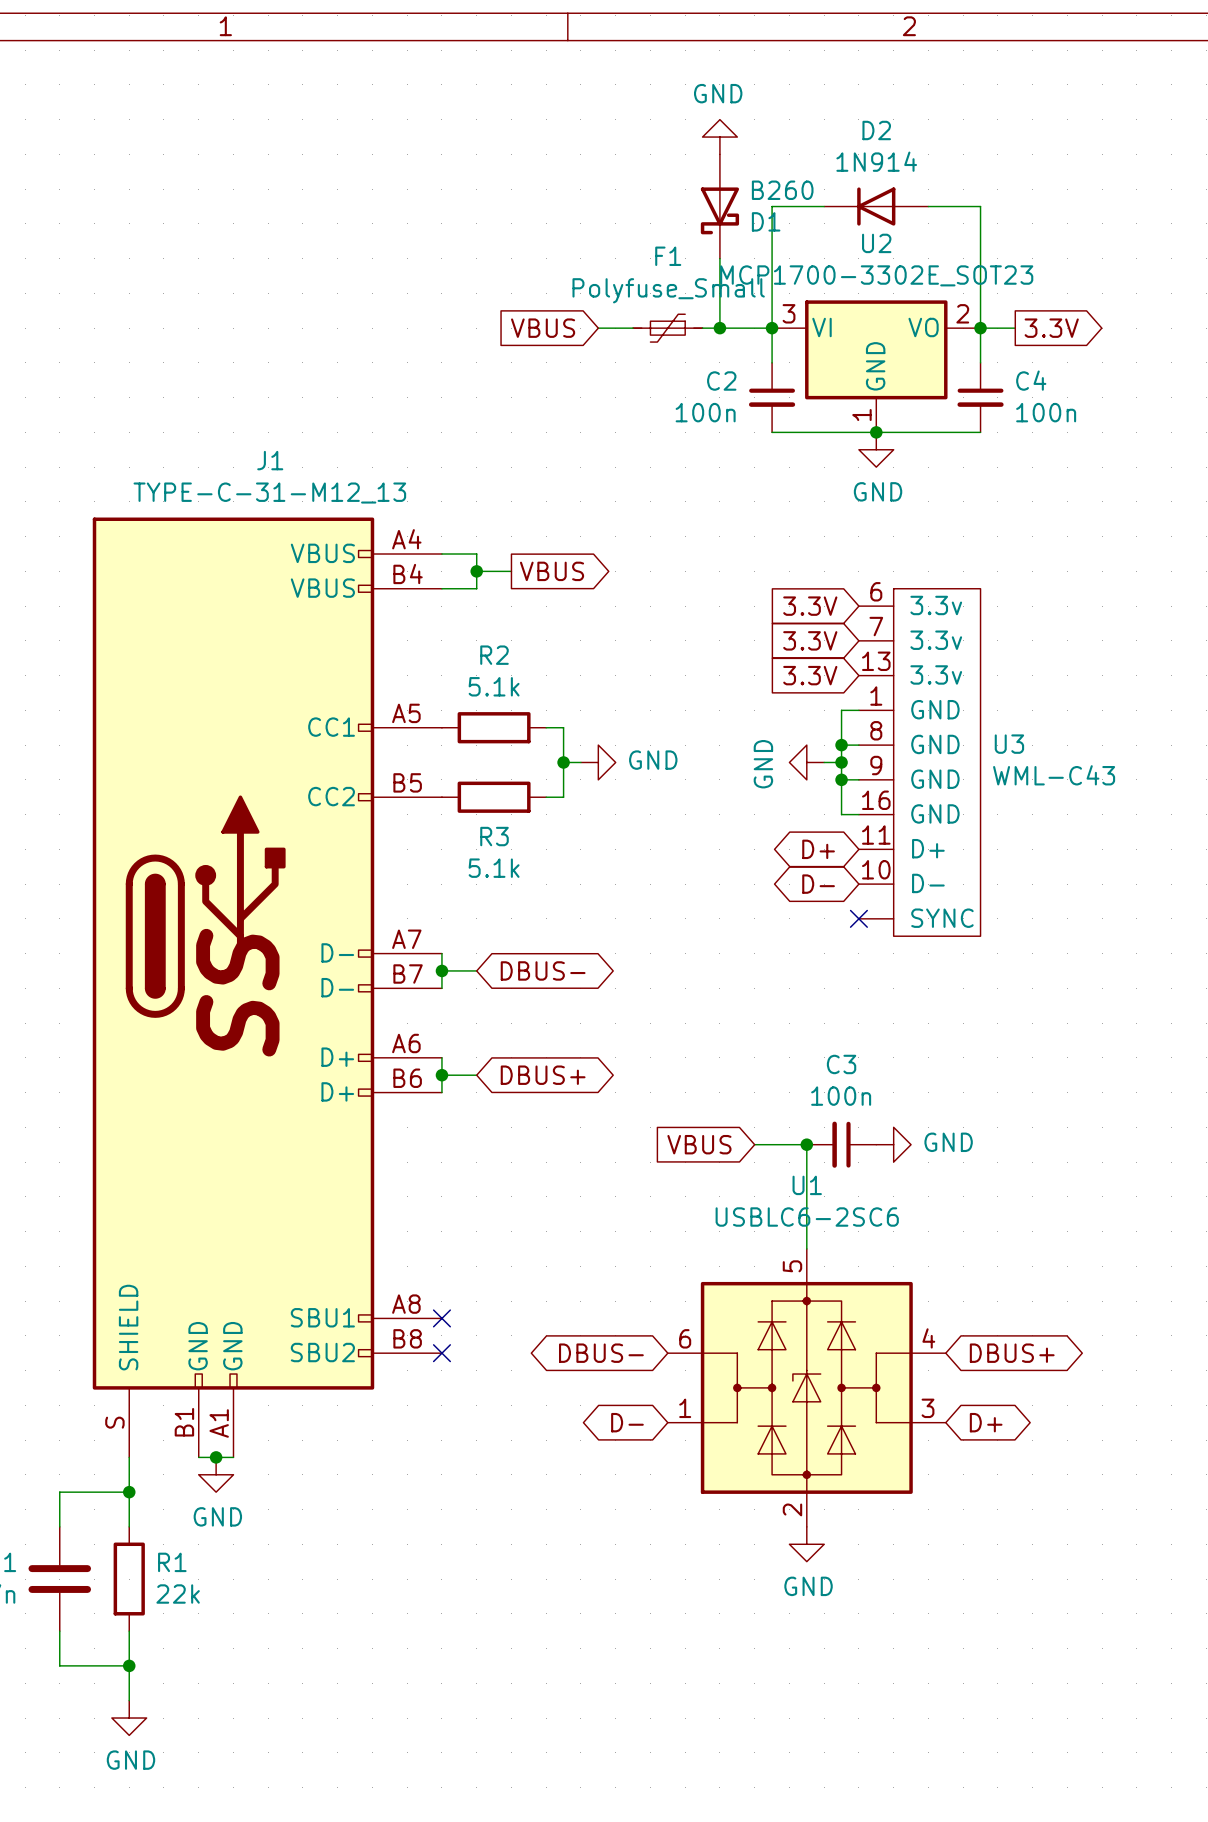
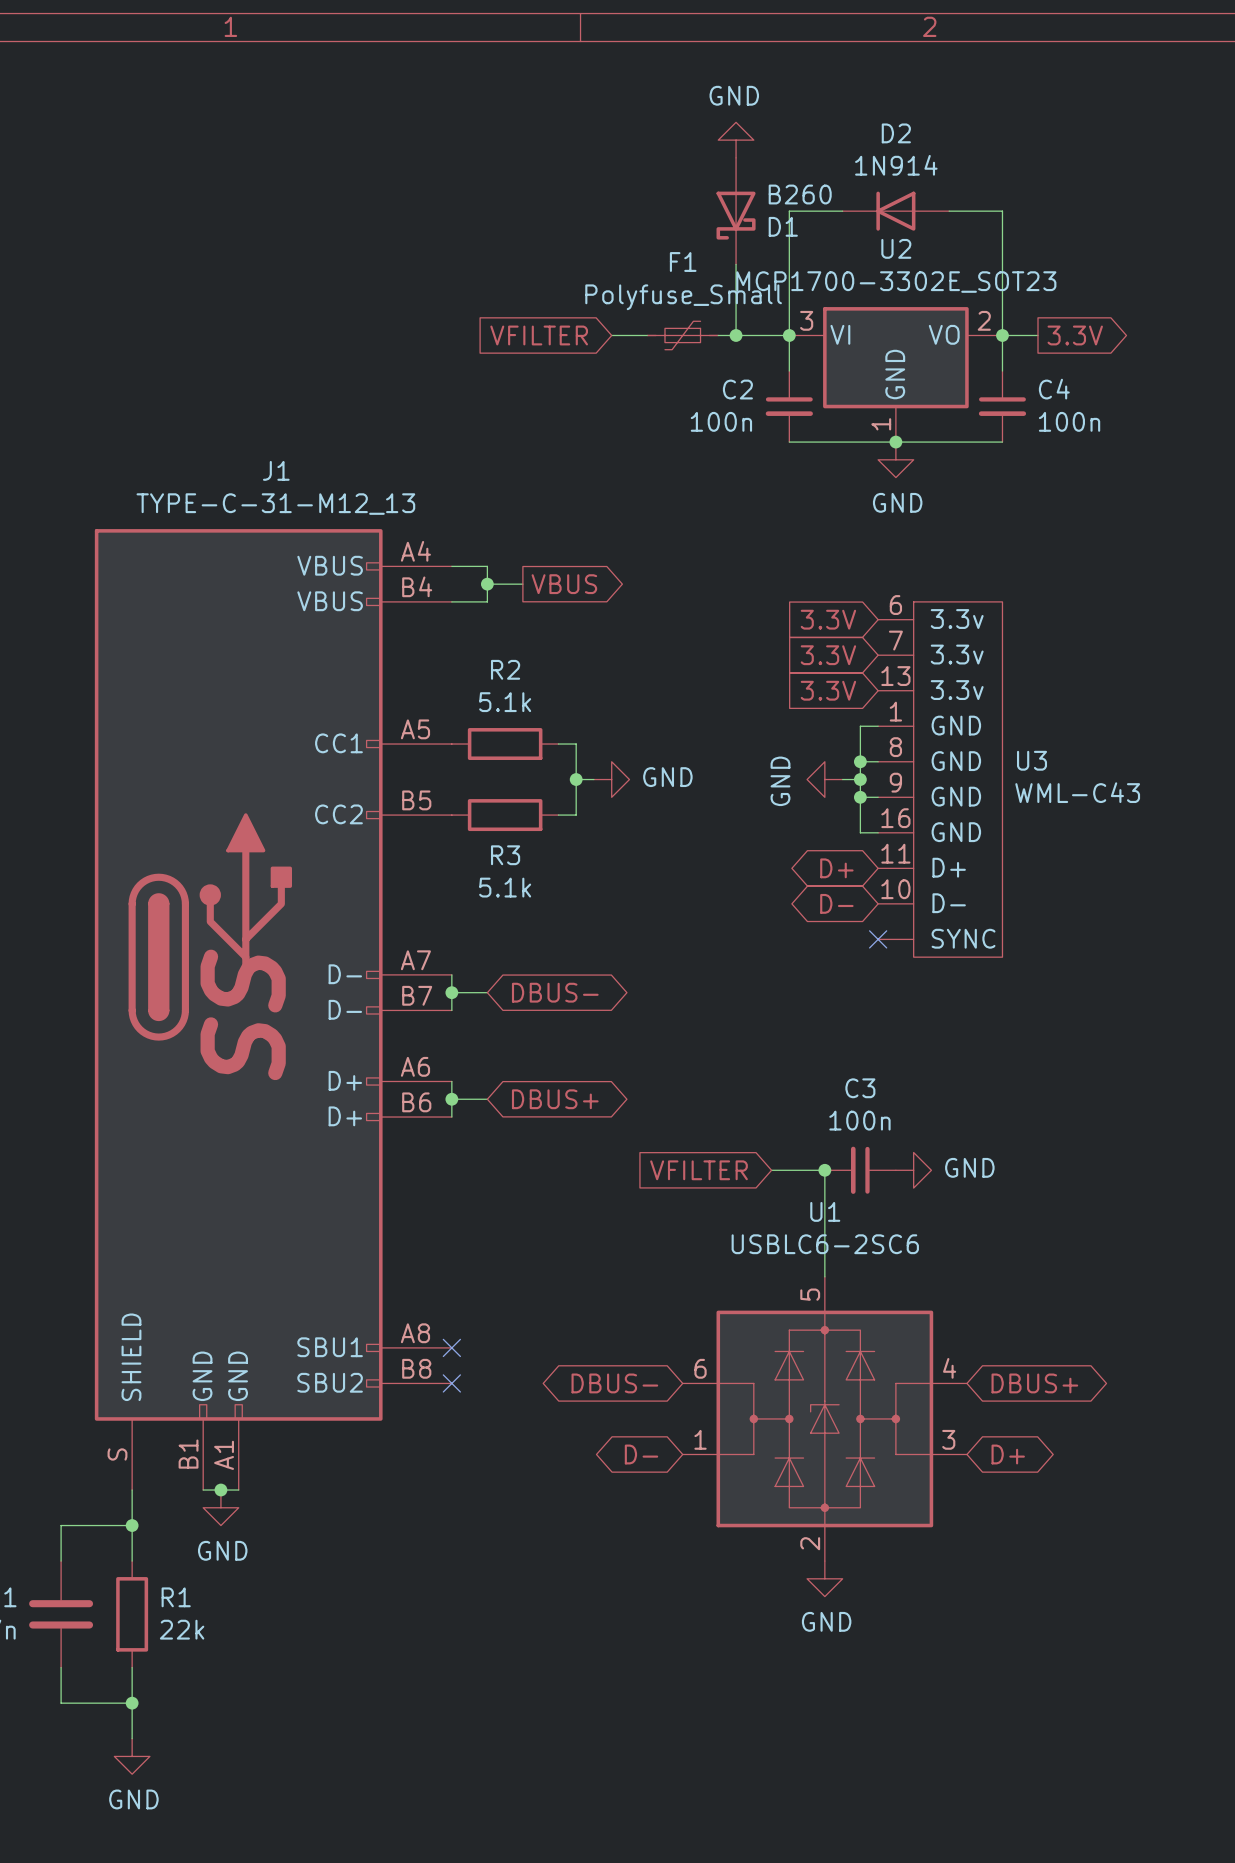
global label: VBUS (543, 328) -> VFILTER (539, 335)
global label: VBUS (699, 1144) -> VFILTER (699, 1170)

